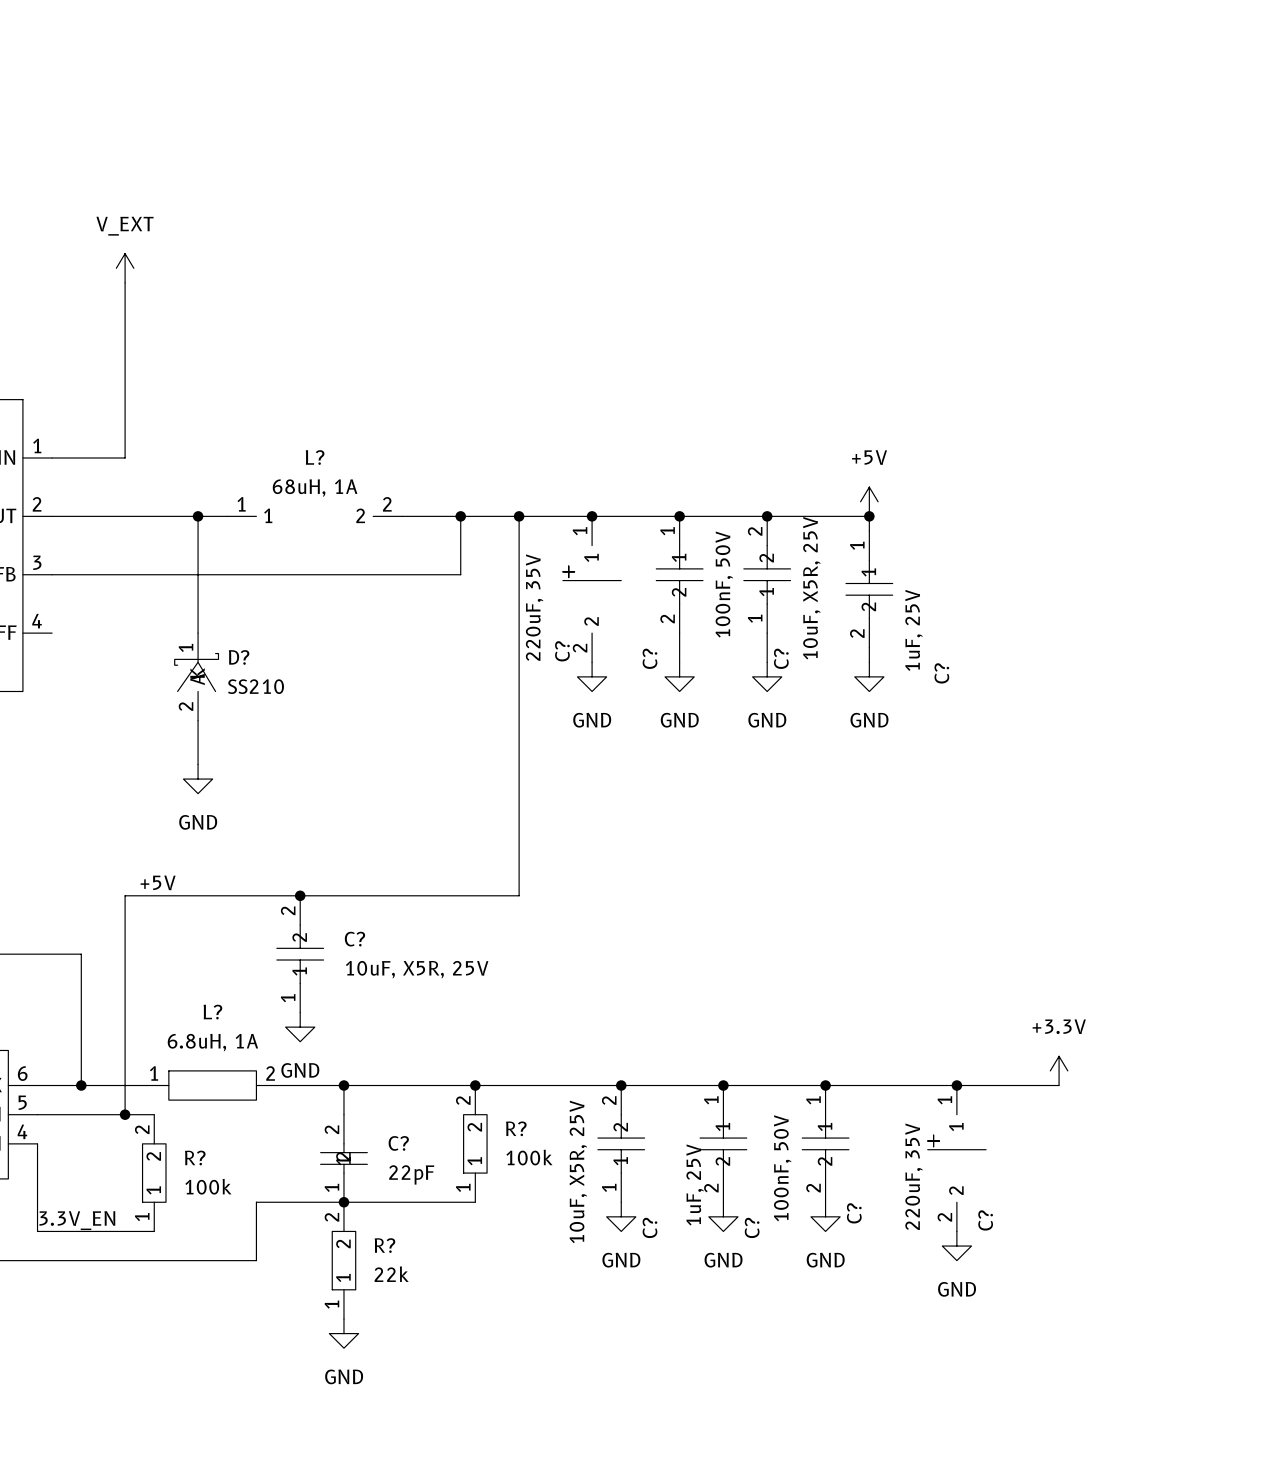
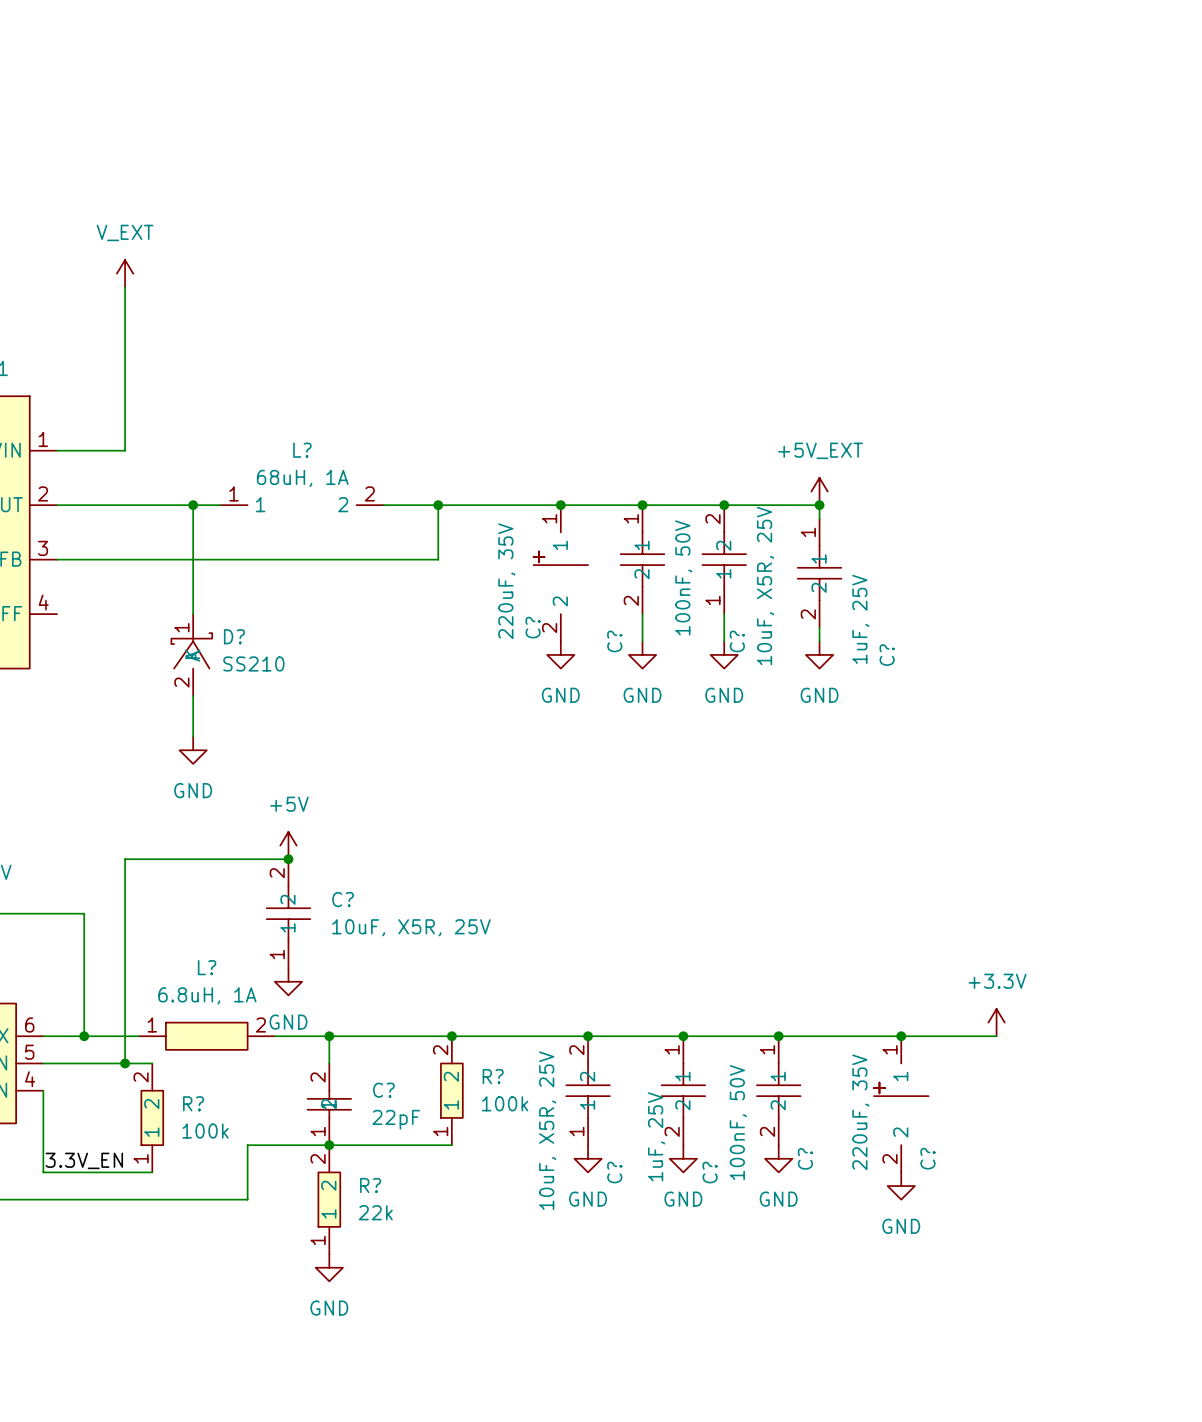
power symbol: +5V (869, 501) -> +5V_EXT (819, 491)
wire: (519, 516) (519, 895) (300, 895) -> none
junction: (519, 516) -> none
power symbol: none -> +5V (288, 845)
label: +5V (158, 882) -> none

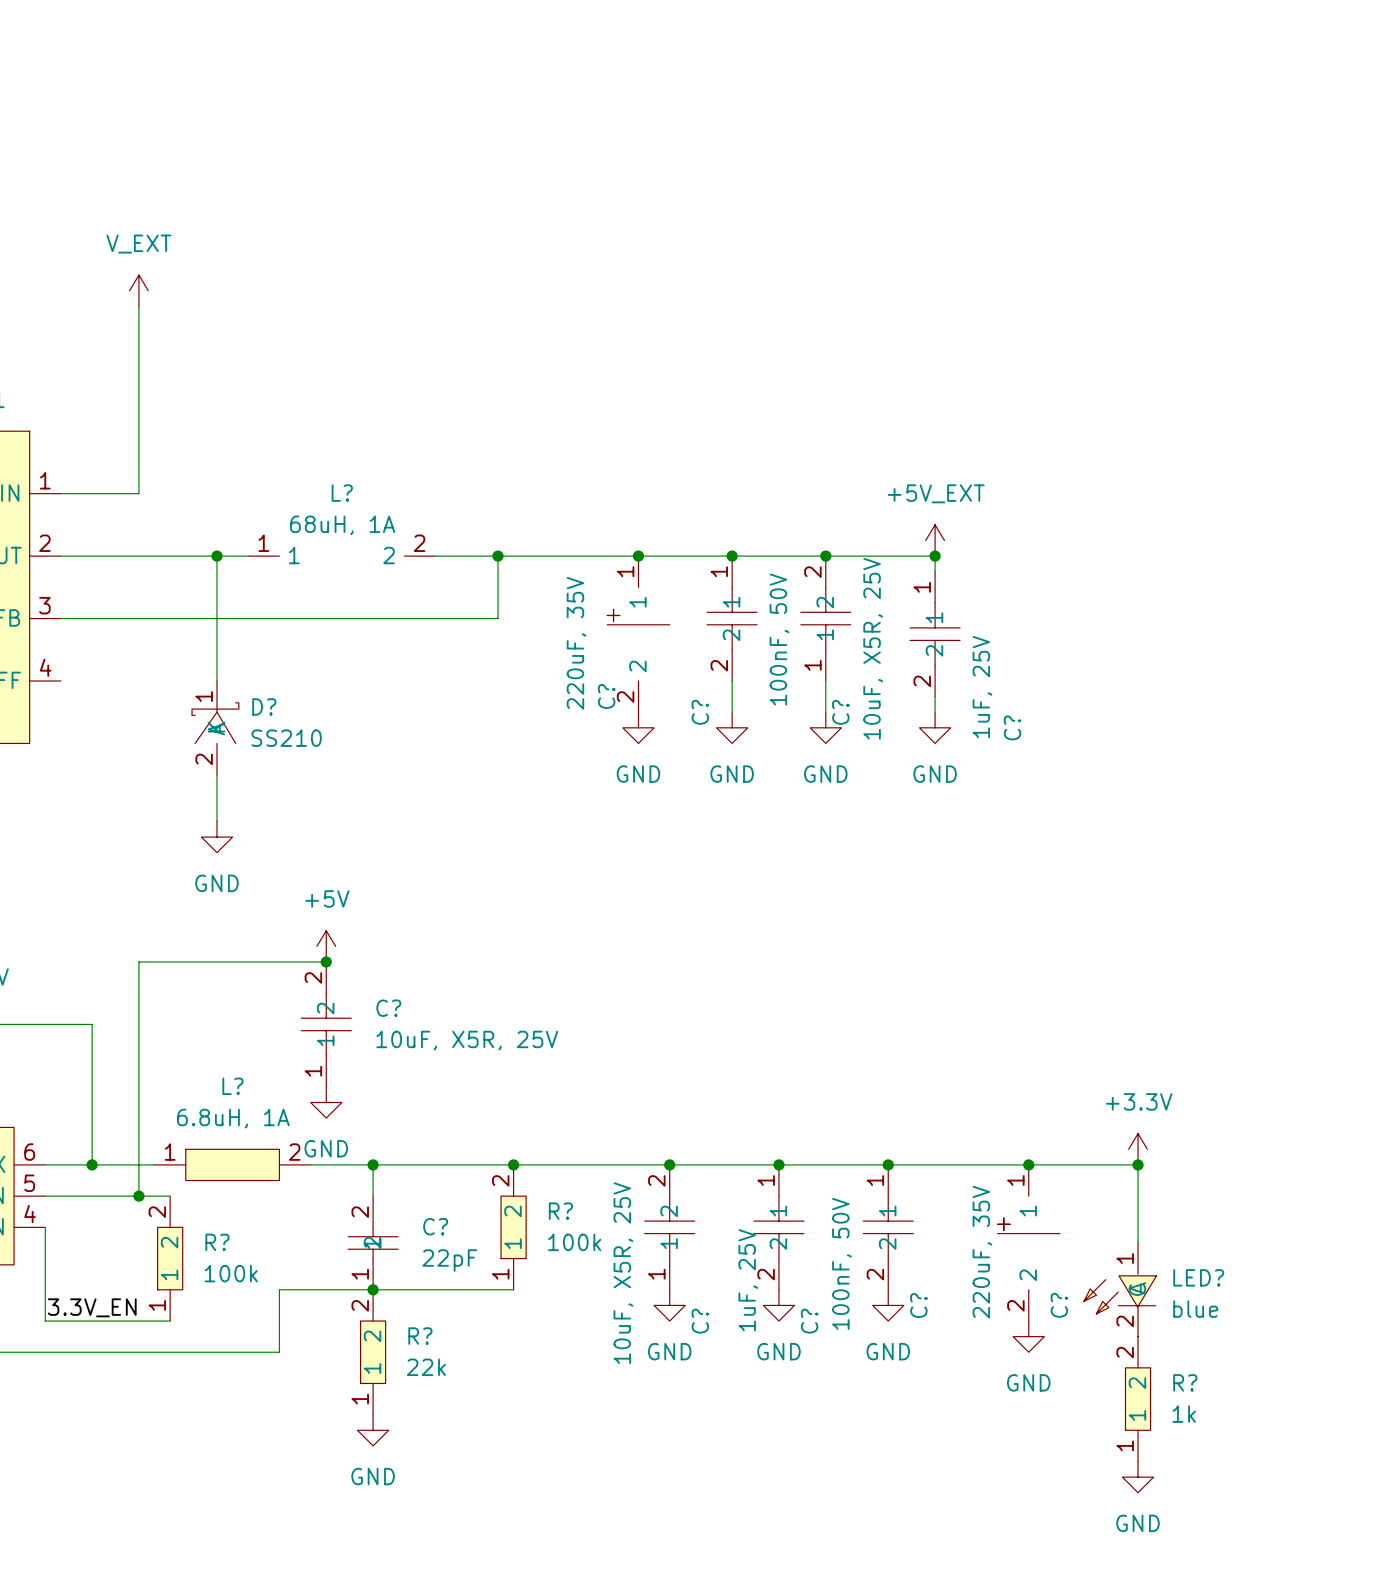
wire: none -> (1138, 1164) (1138, 1242)
junction: none -> (1138, 1164)
LED?: none -> blue (1120, 1289)
R?: none -> 1k (1138, 1399)
power symbol: none -> GND (1138, 1477)

